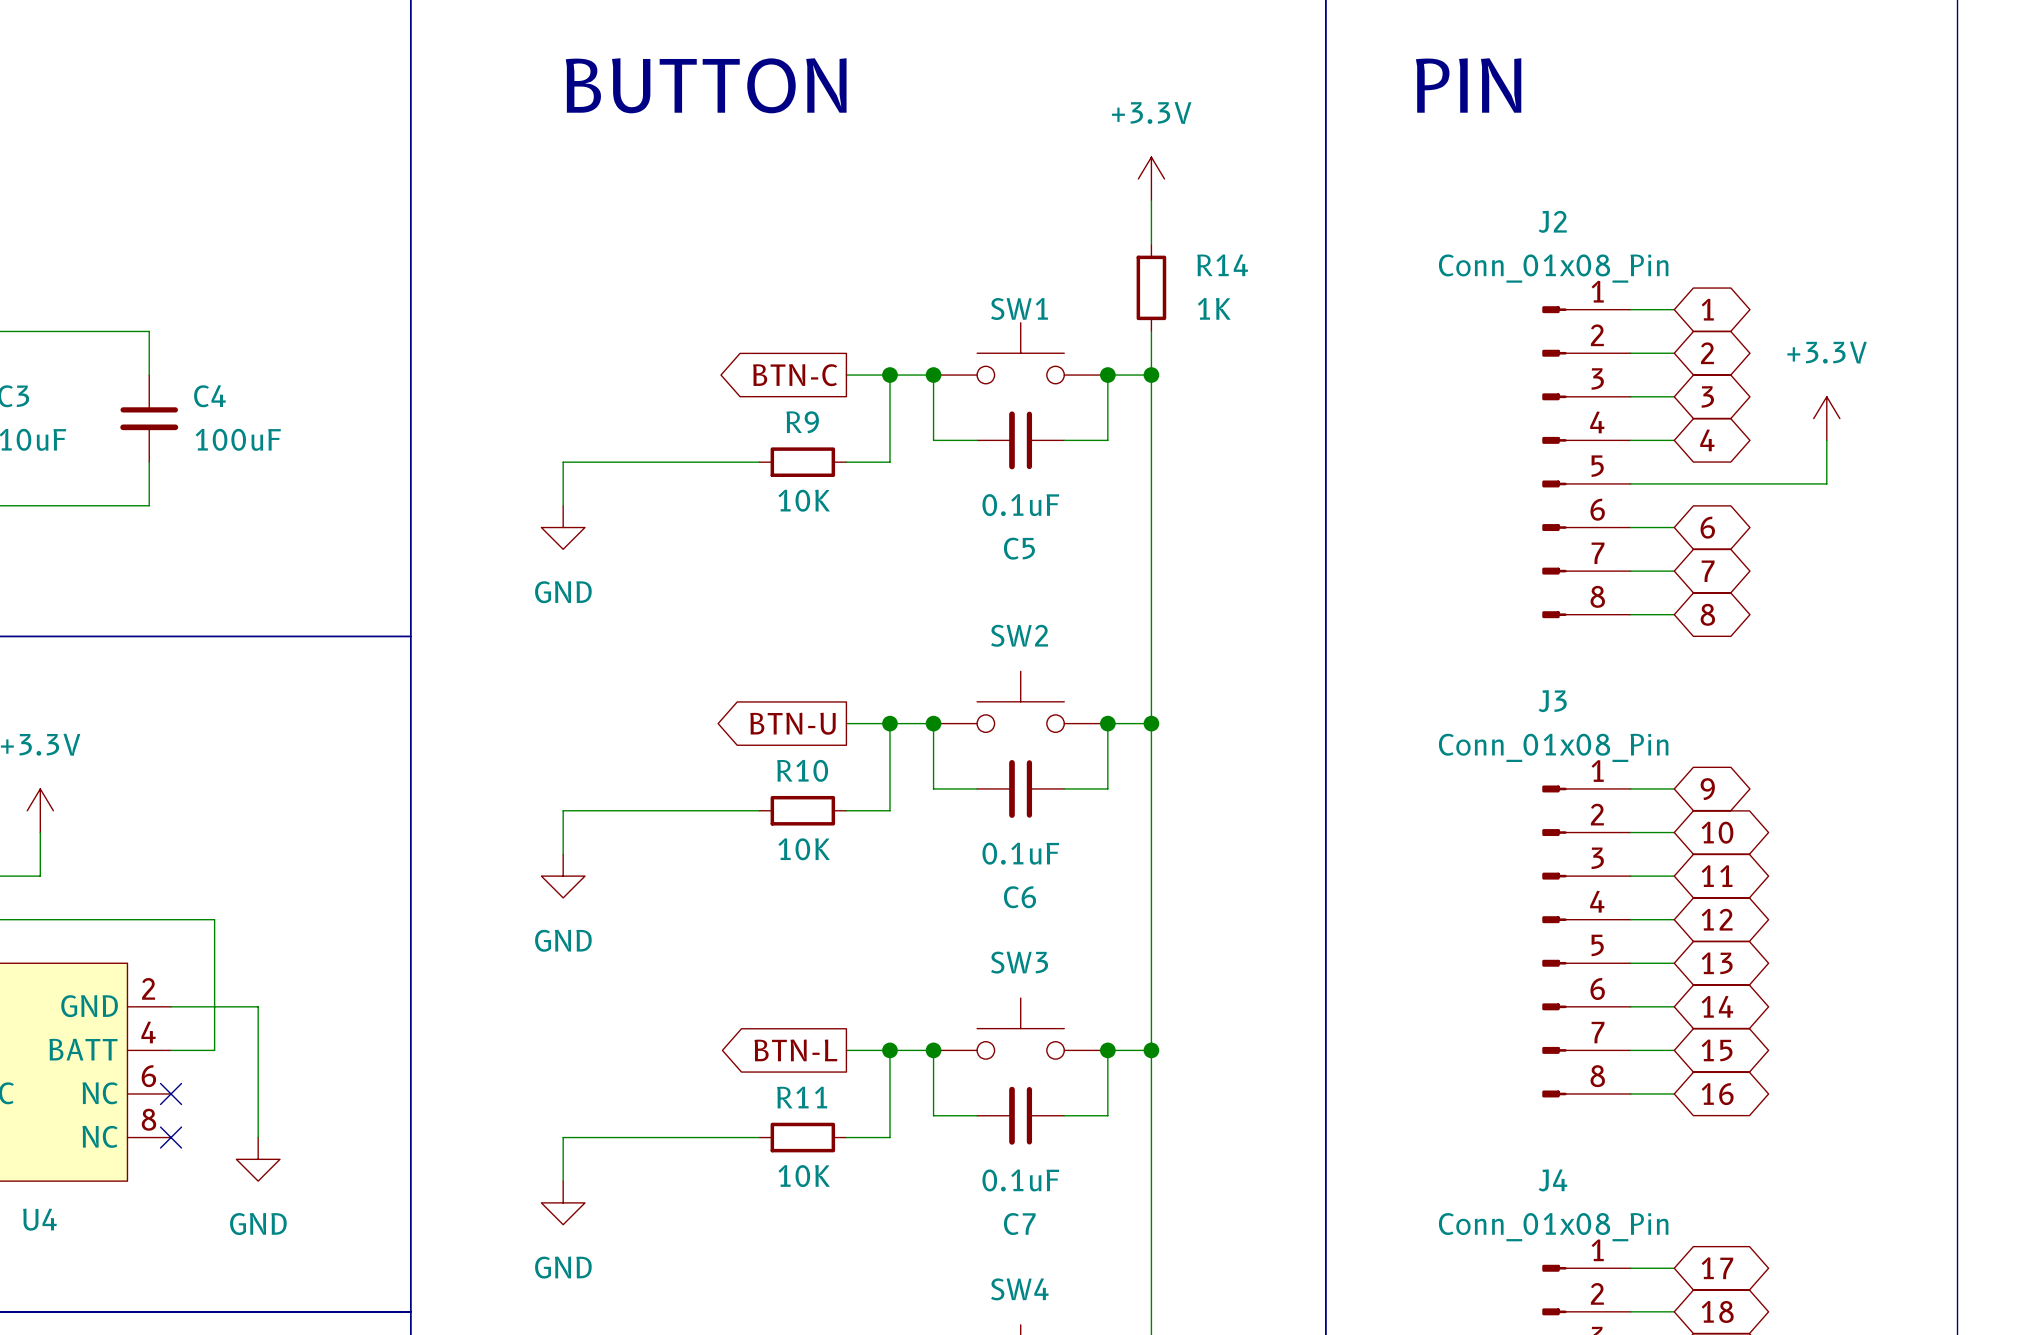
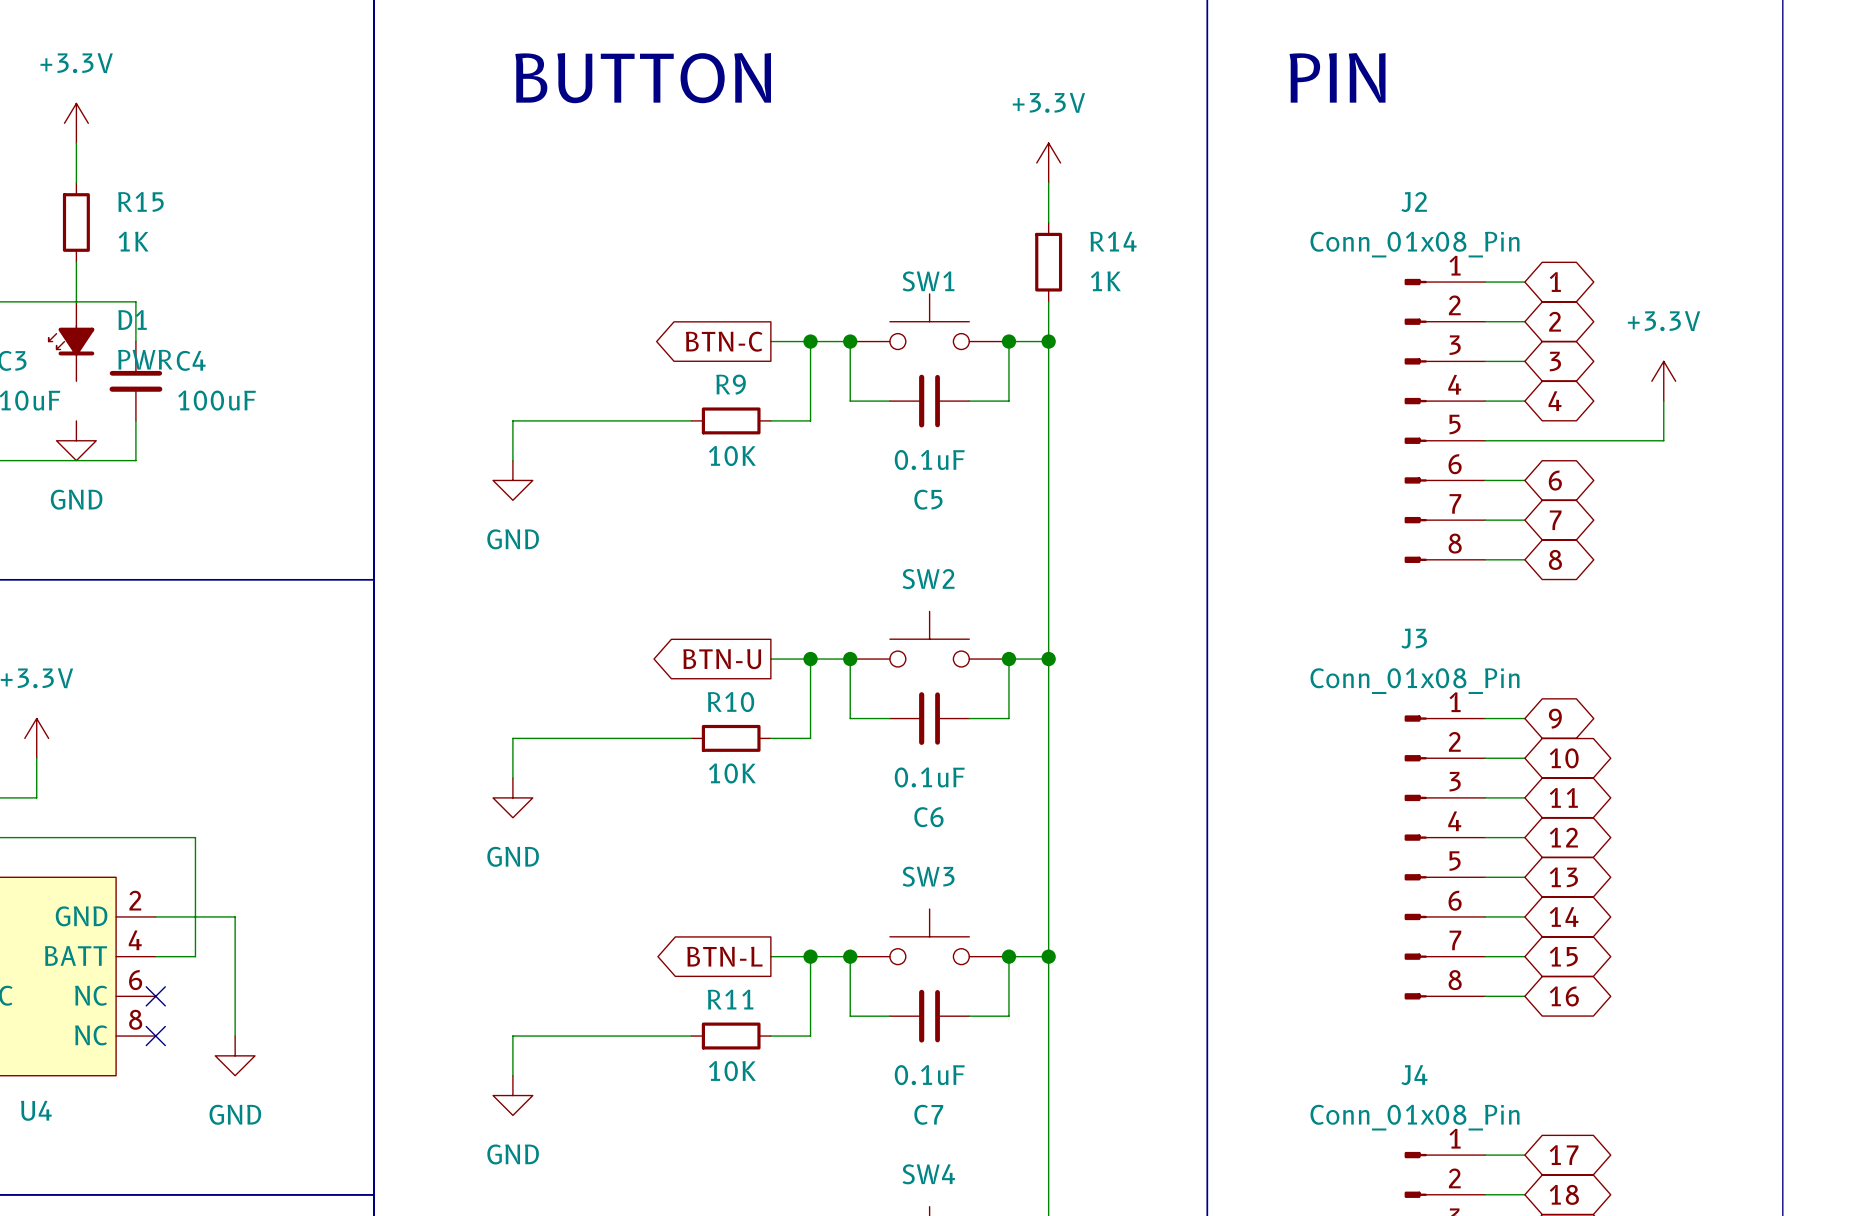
power symbol: none -> +3.3V (76, 123)
wire: none -> (76, 143) (76, 182)
R15: none -> 1K (76, 222)
wire: none -> (76, 262) (76, 301)
D1: none -> PWR (71, 341)
power symbol: none -> GND (76, 440)

